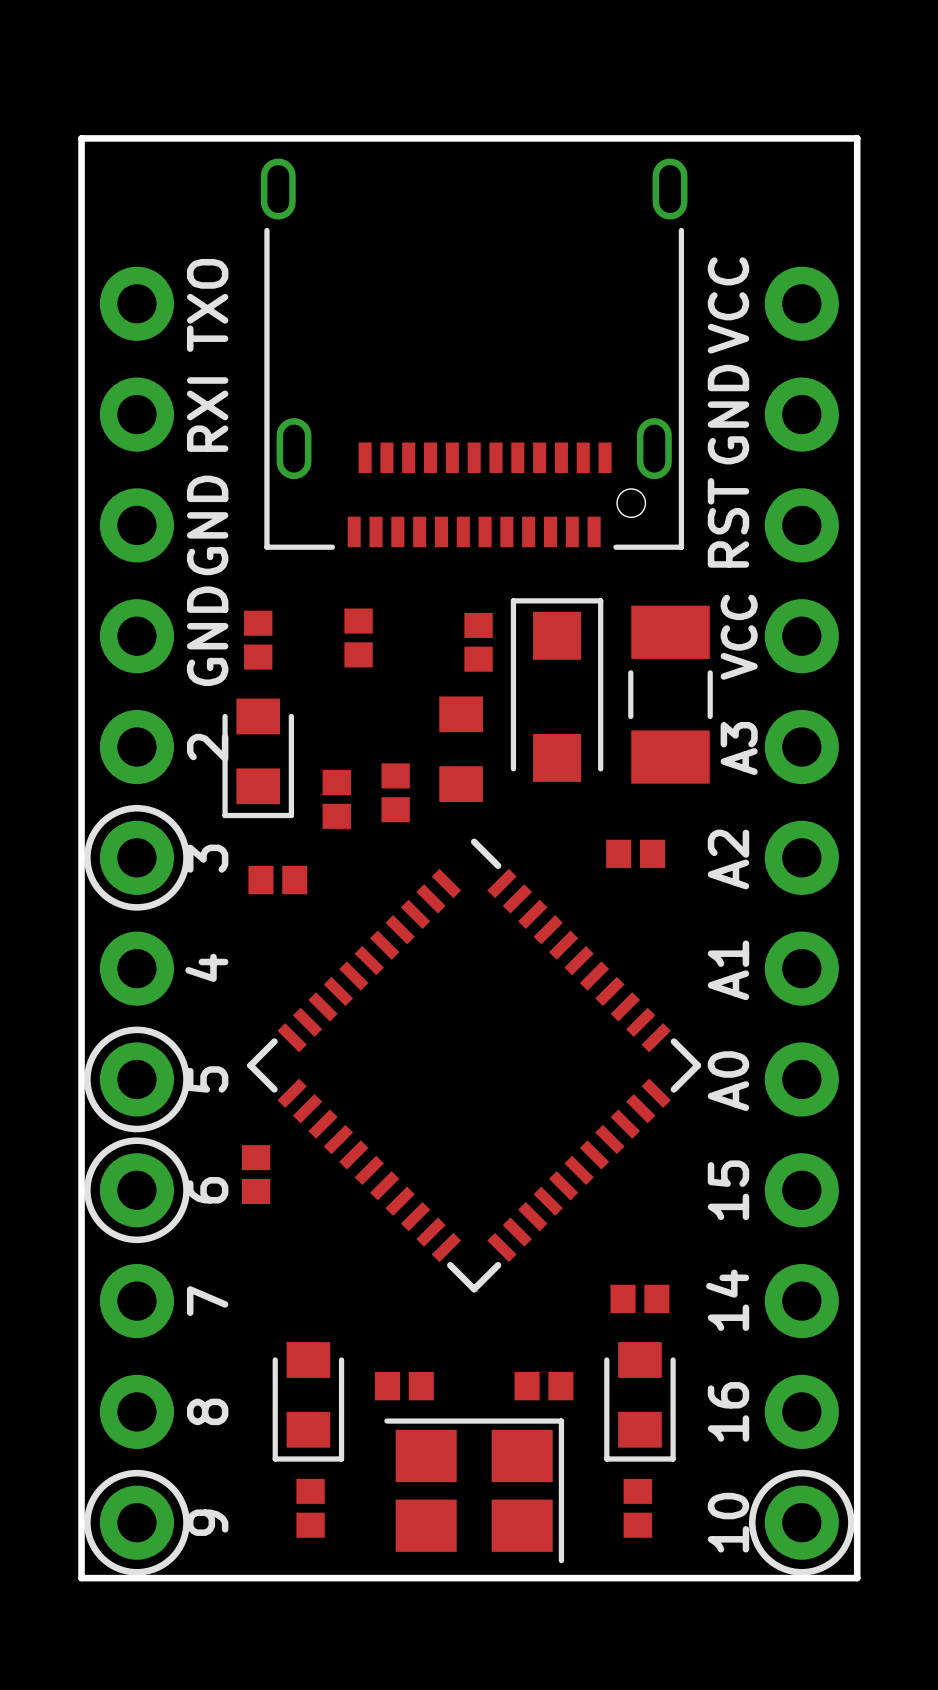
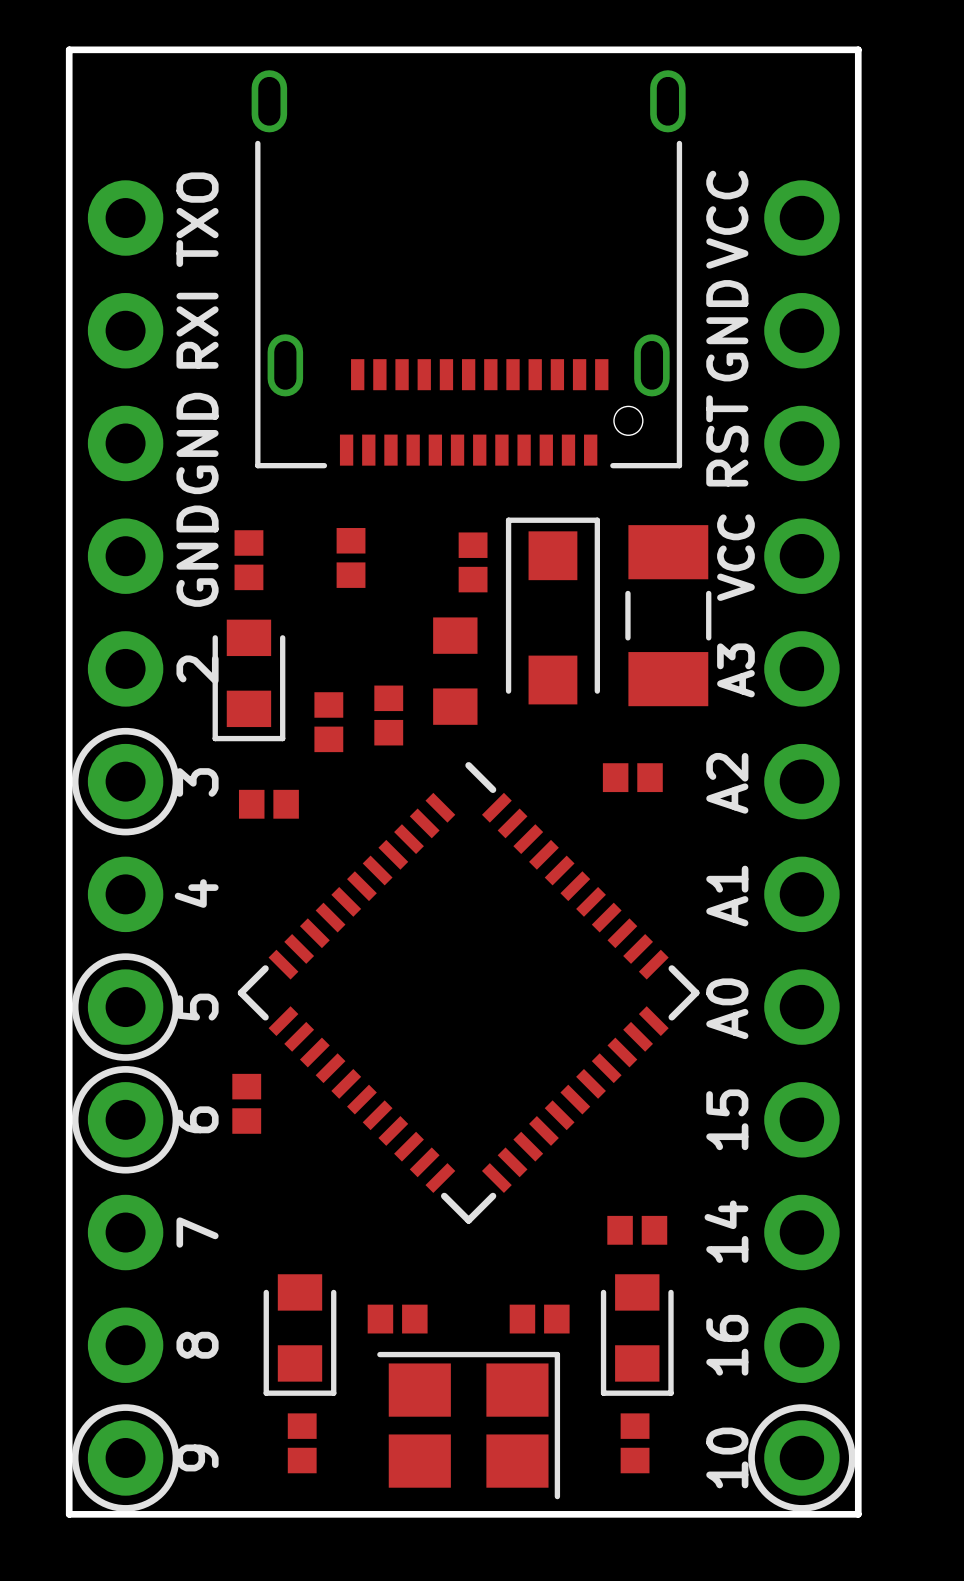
part footprint: [748, 266, 855, 1576] -> [748, 180, 856, 1512]

